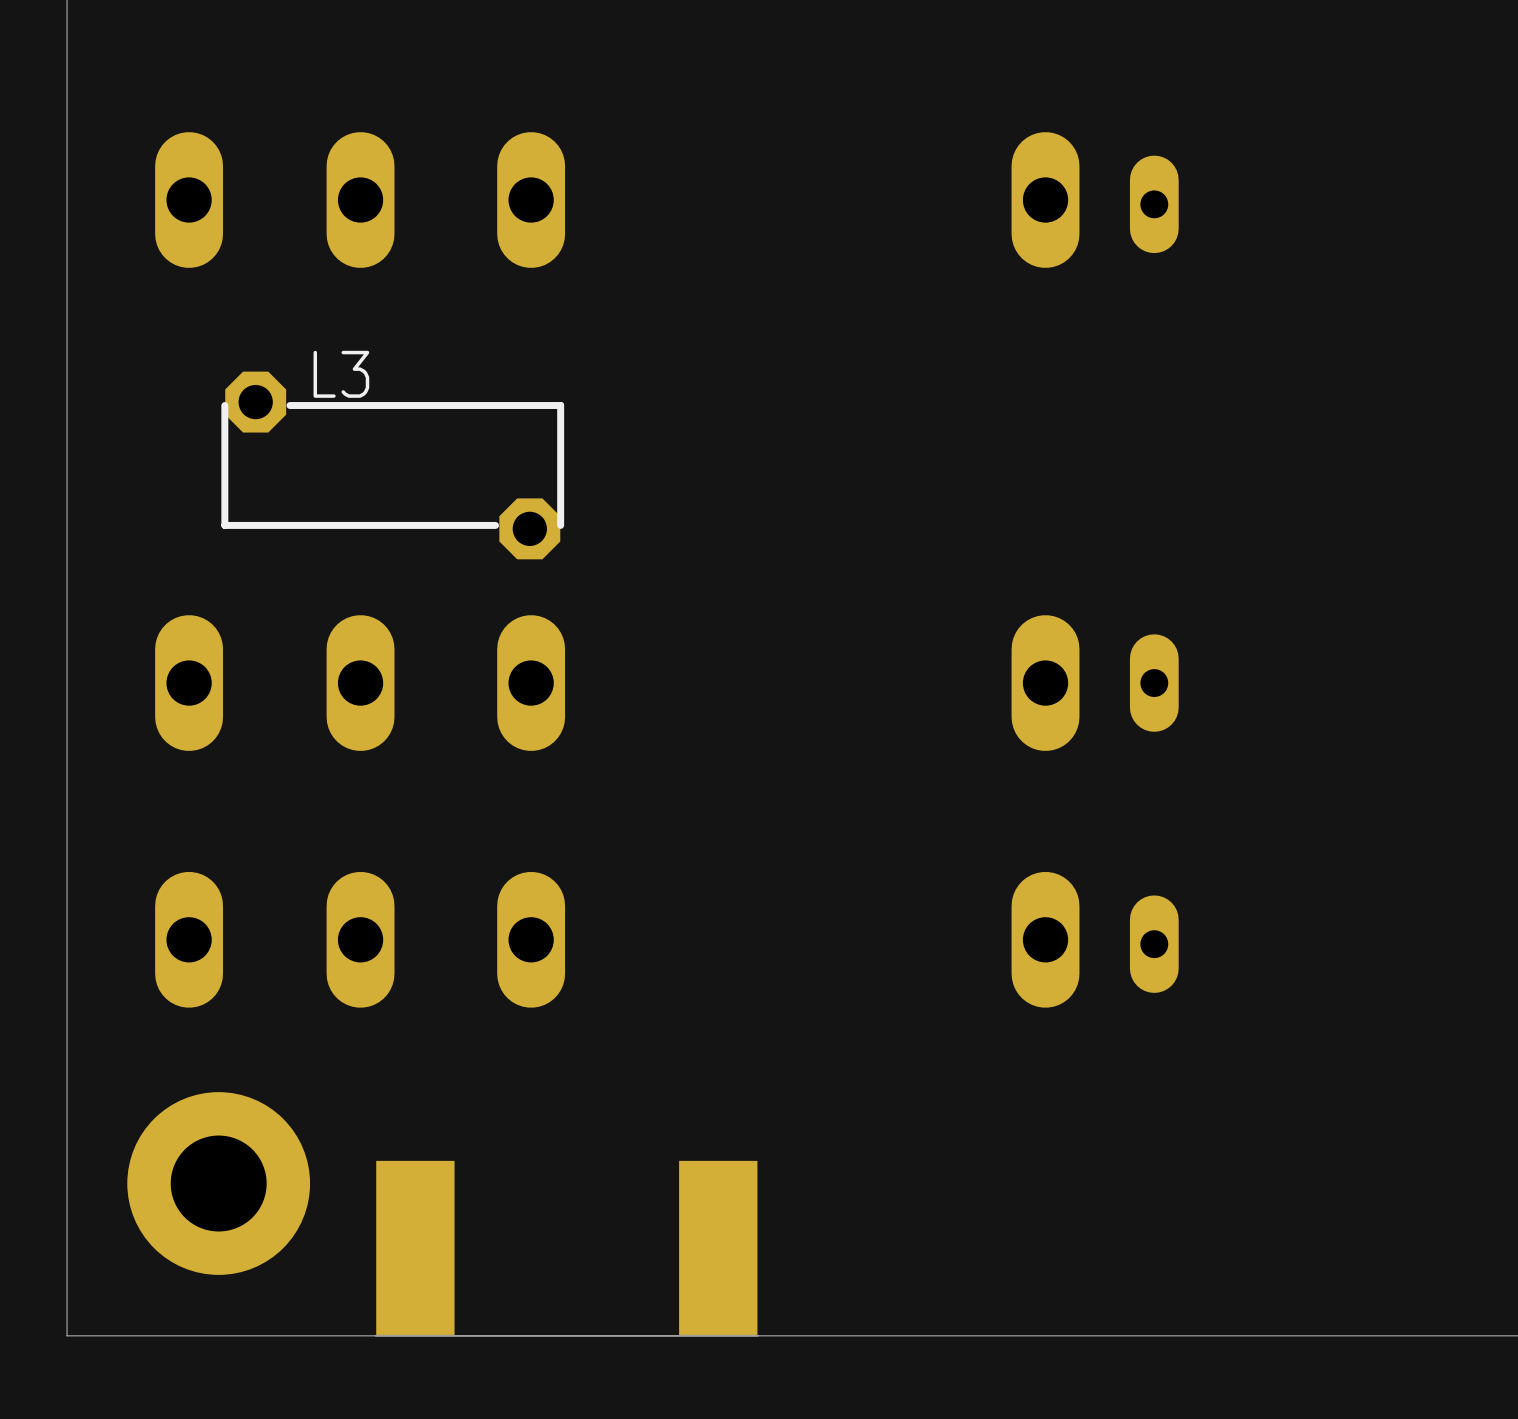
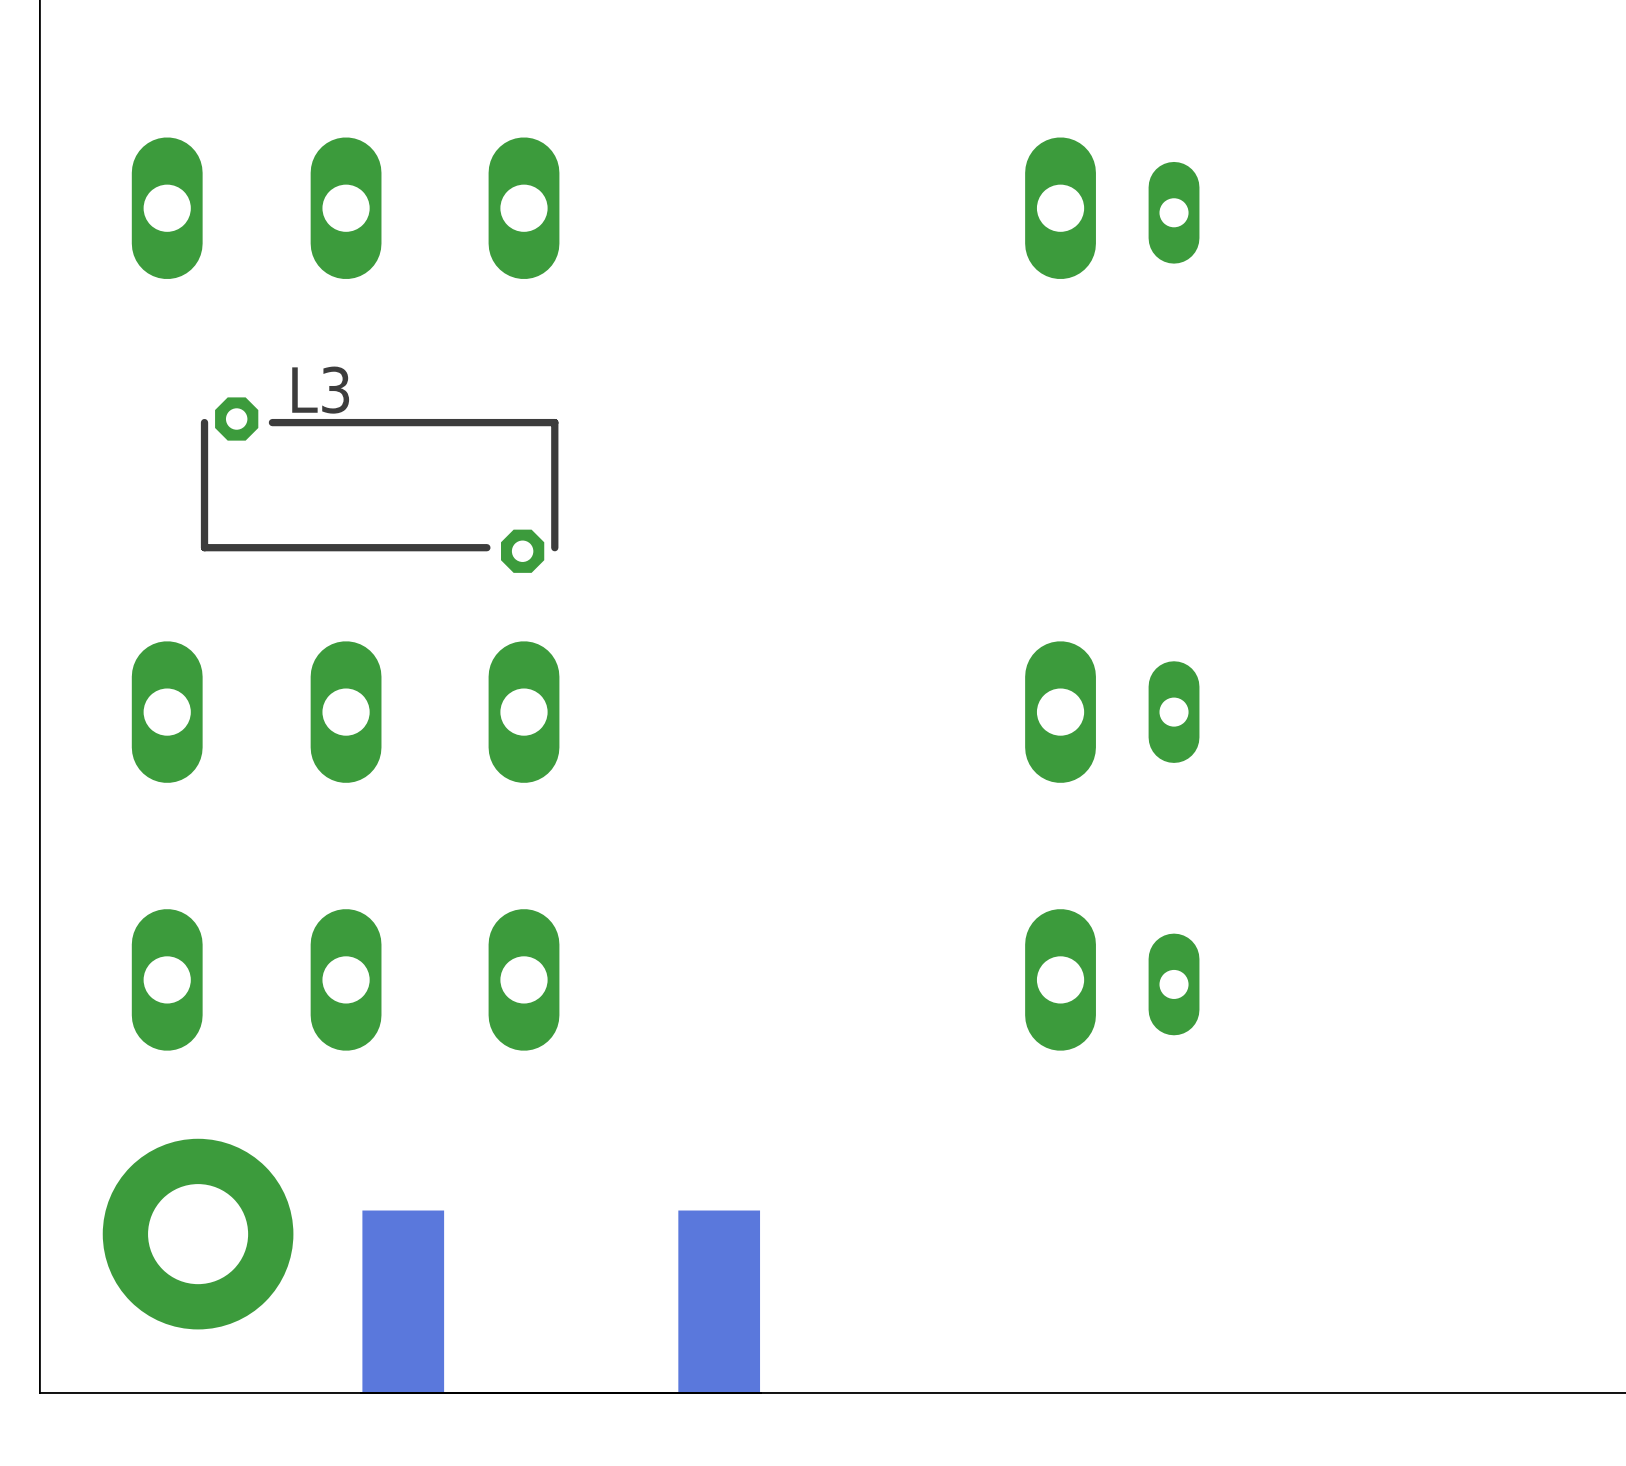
L3 footprint: [221, 371, 565, 560] -> [200, 397, 559, 573]

